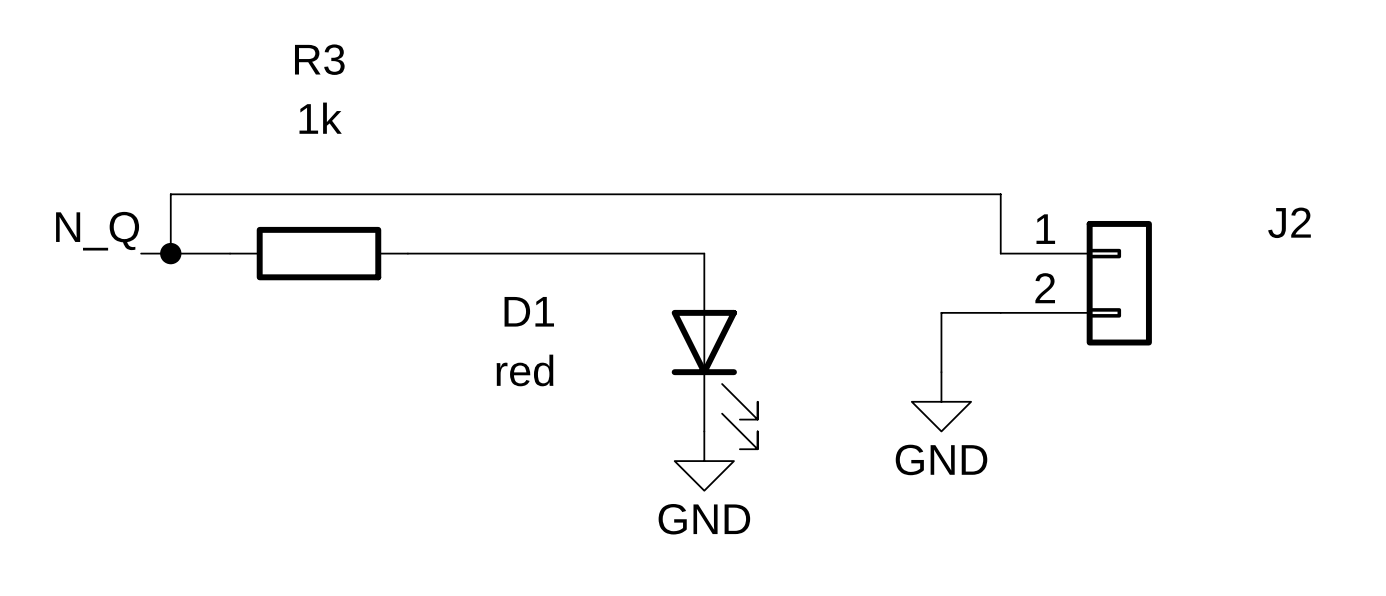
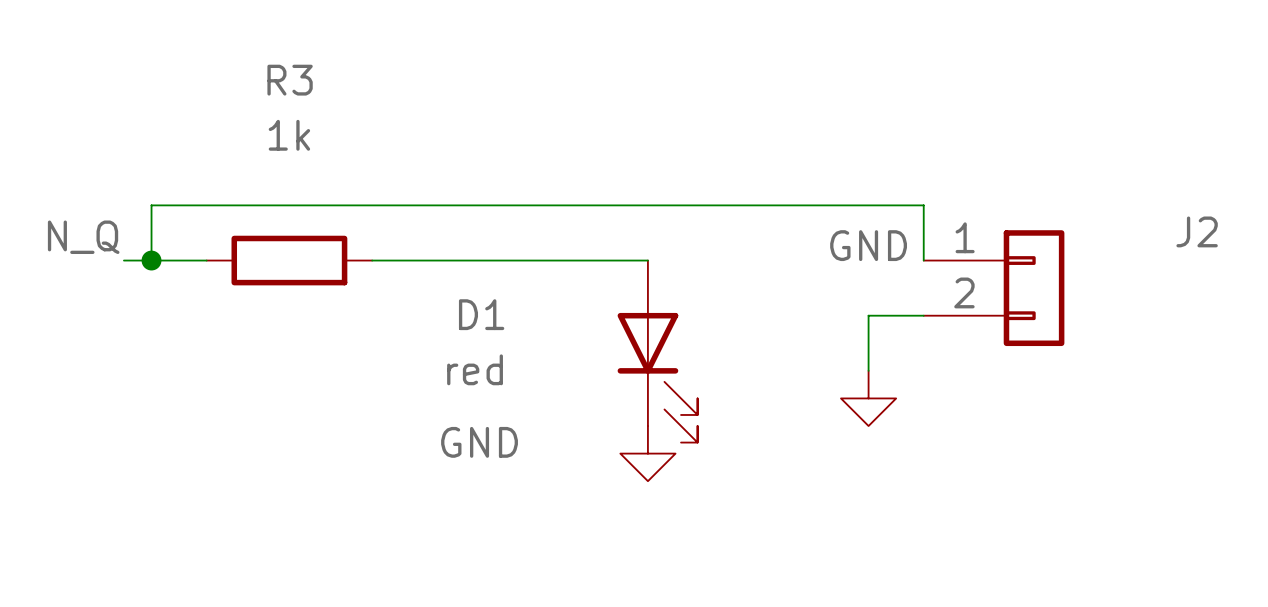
power symbol text position: GND (941, 459) -> GND (868, 245)
power symbol text position: GND (704, 519) -> GND (479, 442)

